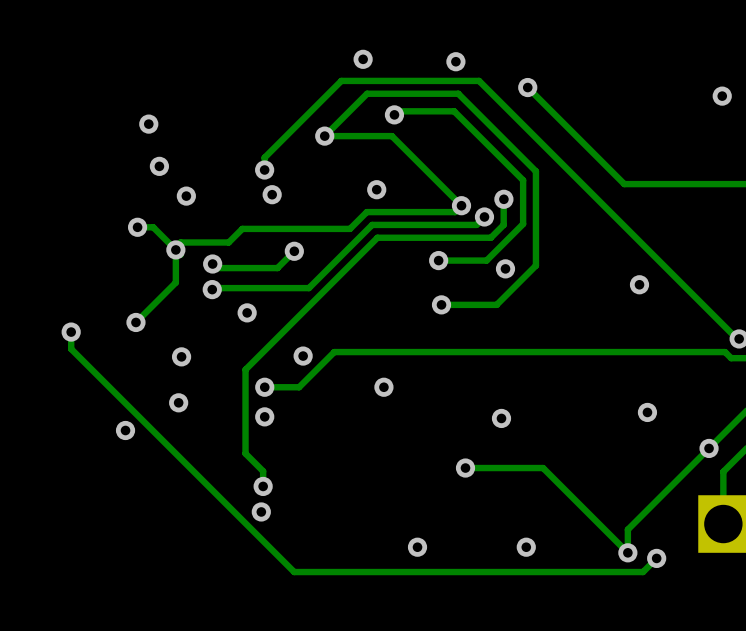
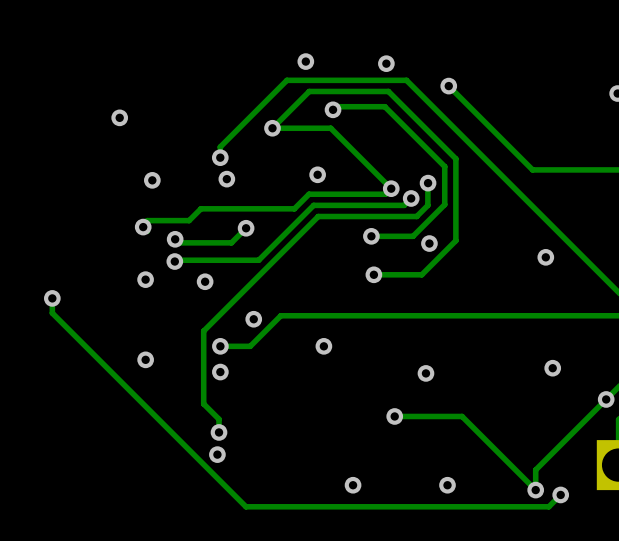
via: (159, 166) -> none
track: (137, 227) (153, 227) (175, 249) (175, 282) (135, 322) -> none
via: (137, 227) -> none
via: none -> (145, 279)
via: (135, 322) -> none
via: (181, 356) -> none
via: (125, 430) -> none

